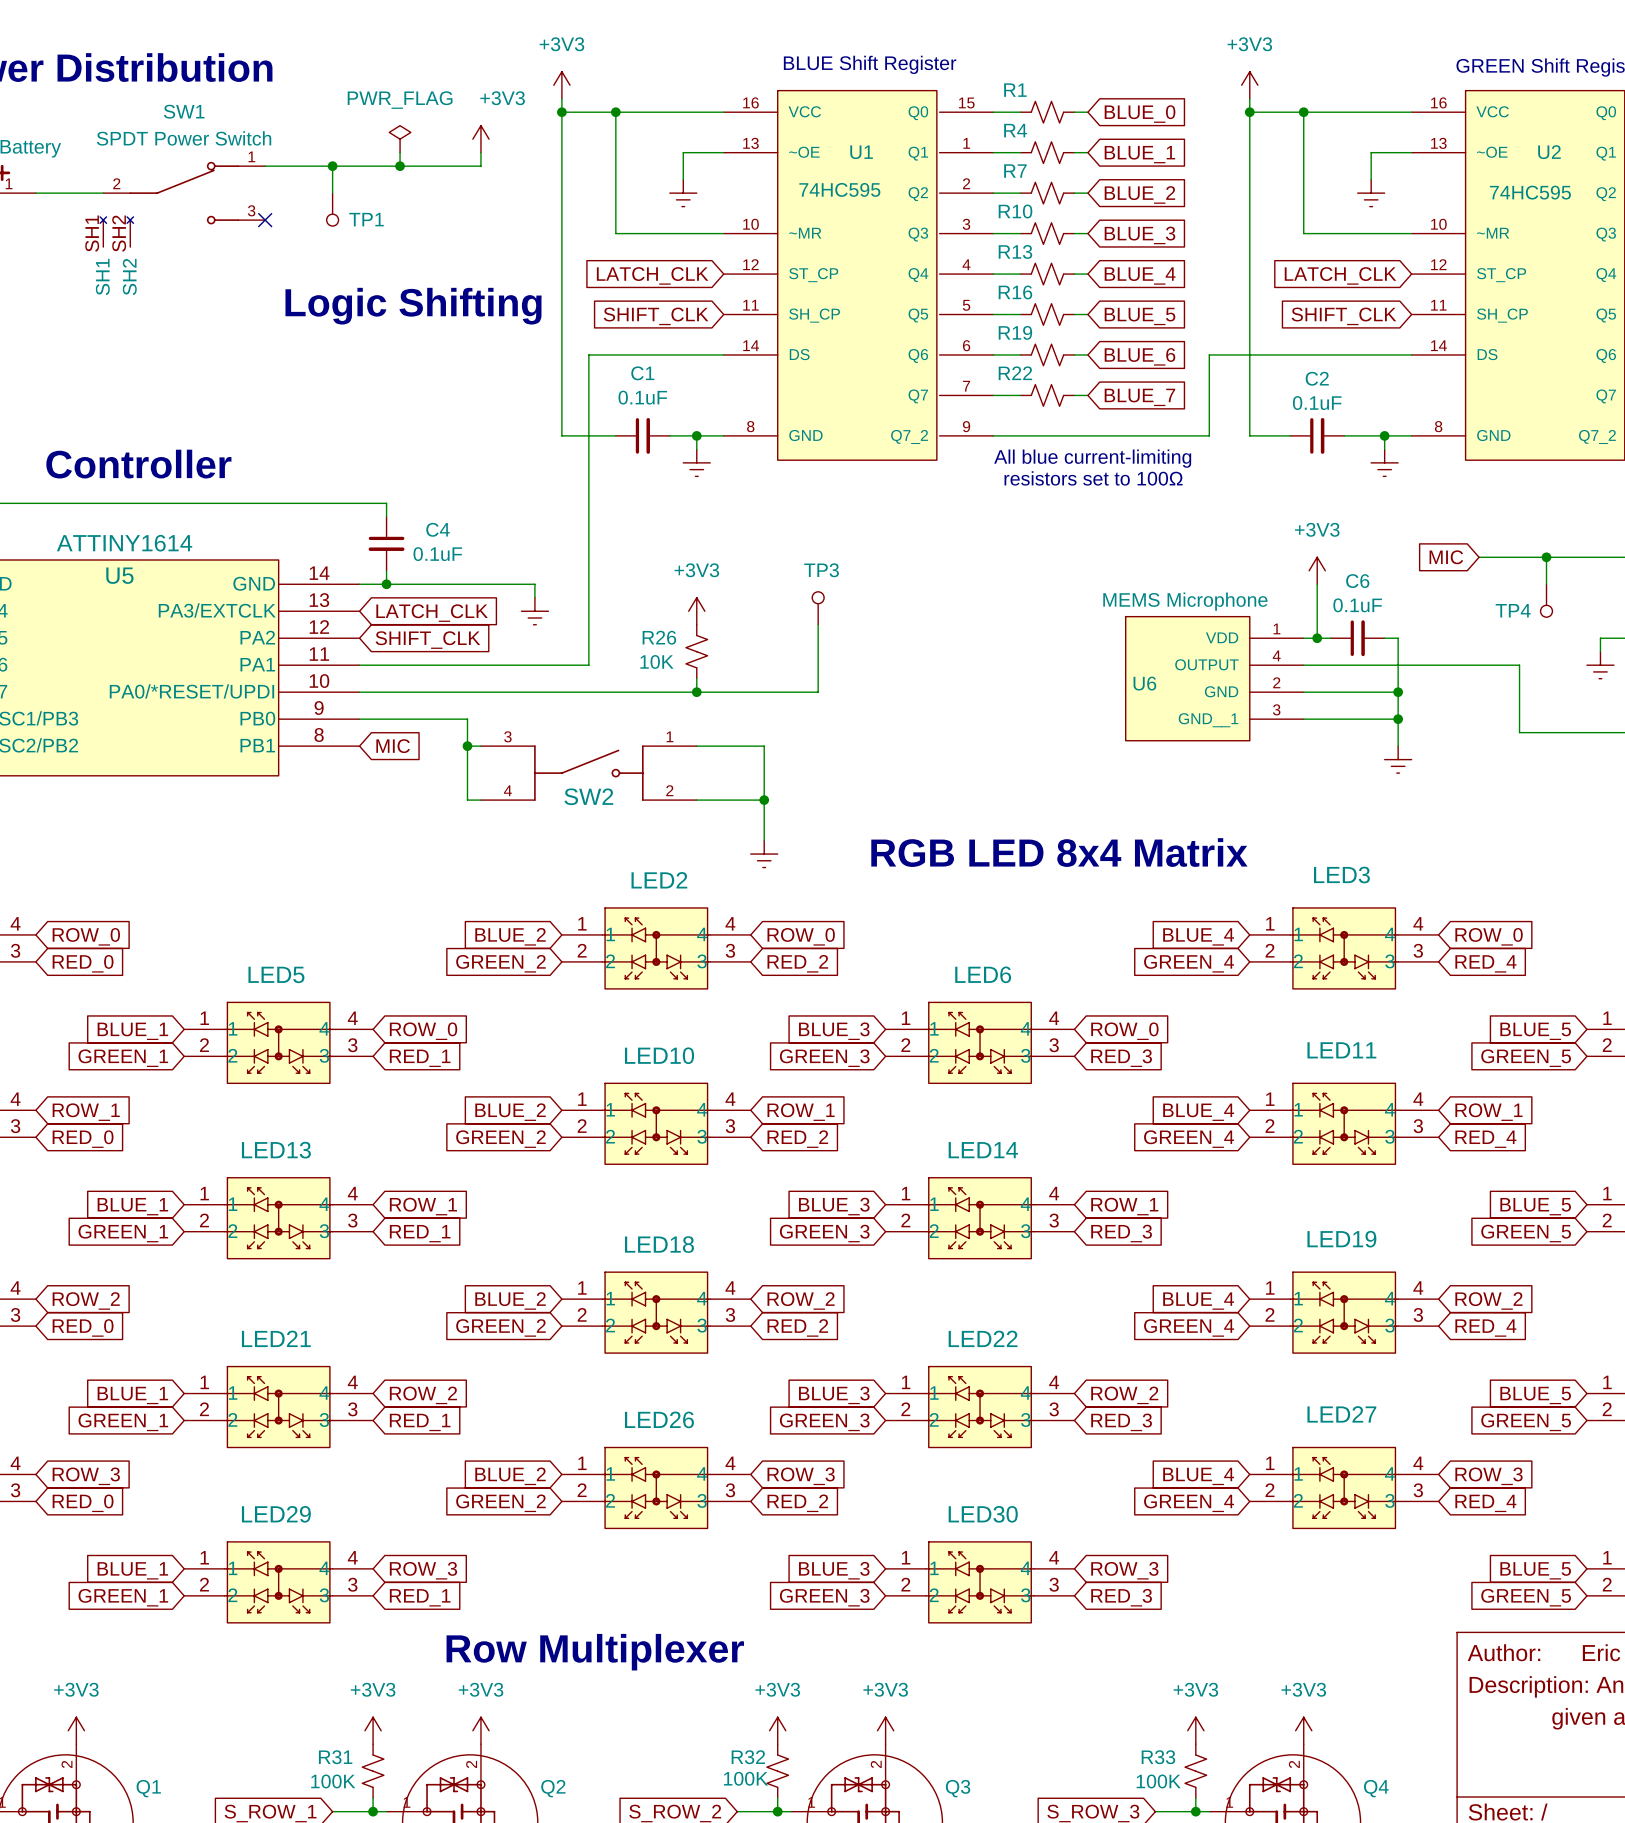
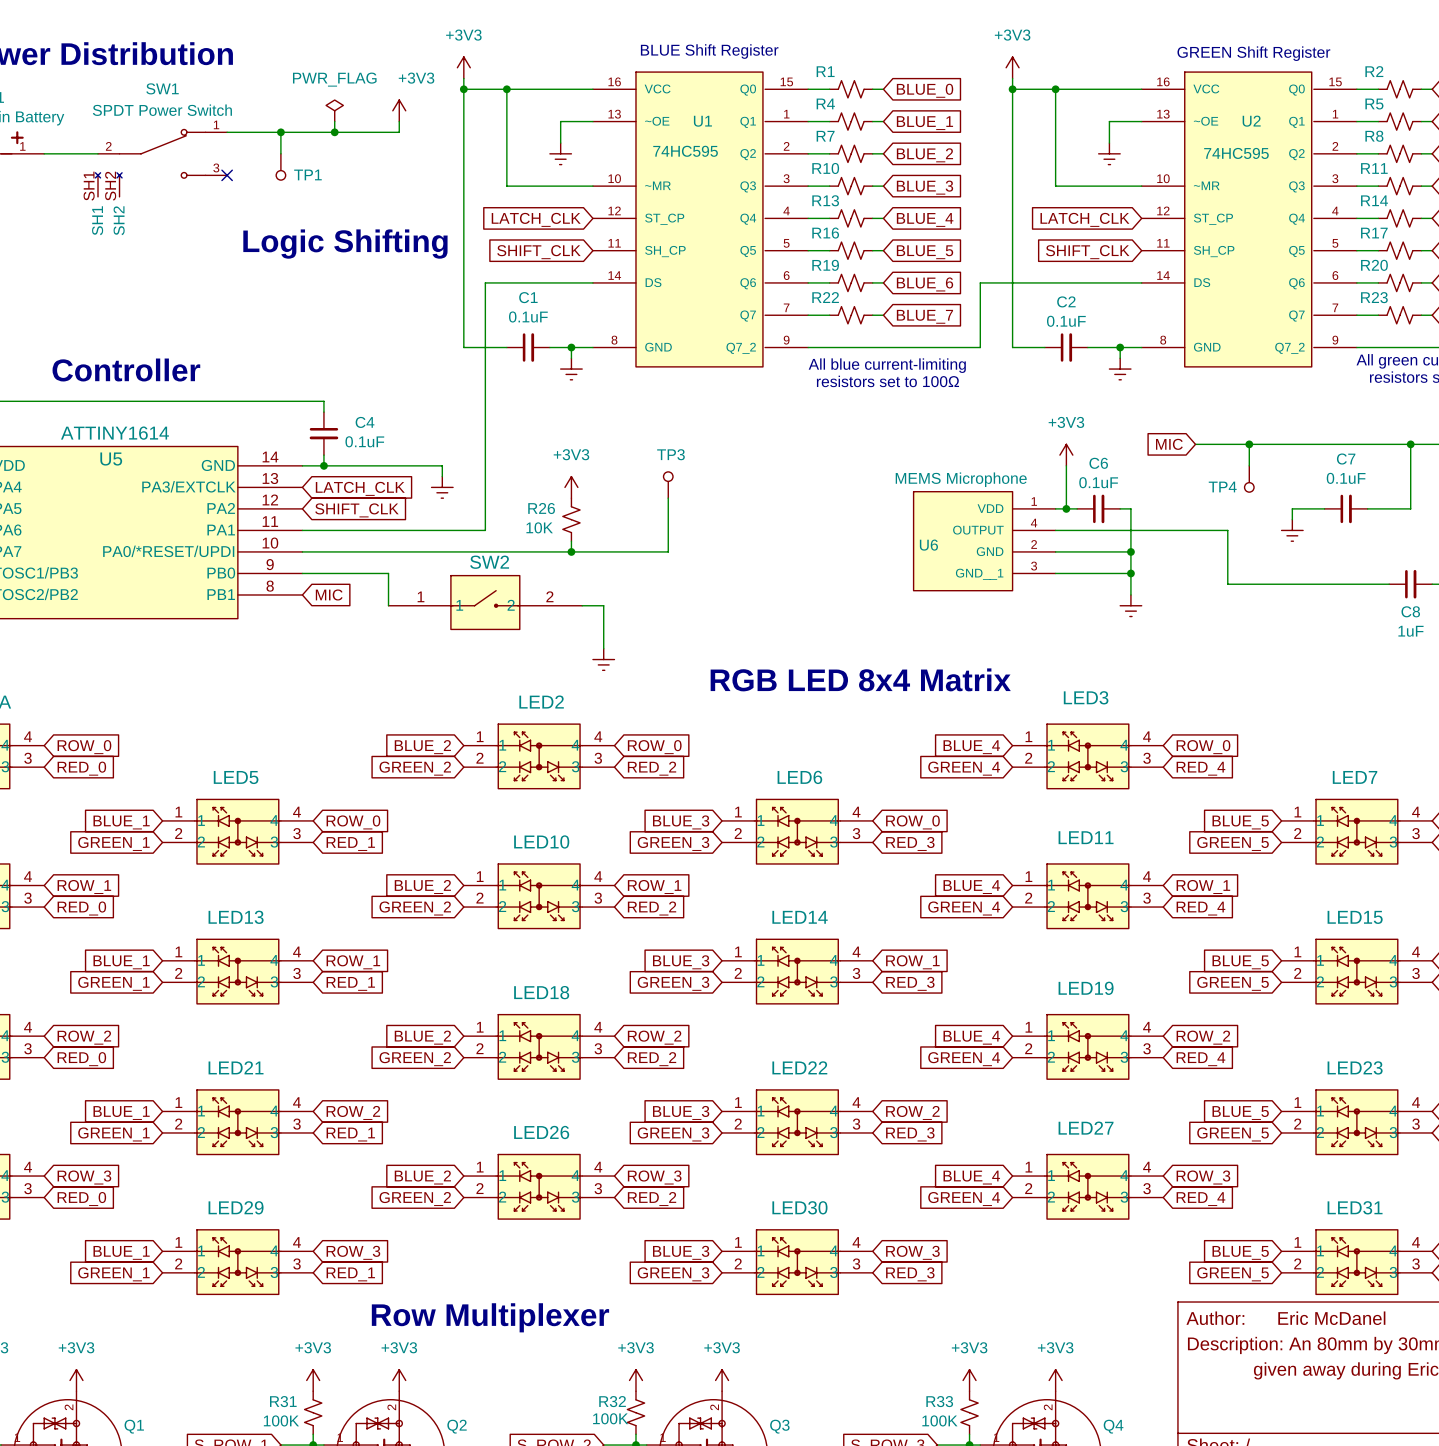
SW2 symbol: [480, 745, 697, 801] -> [388, 575, 583, 630]
wire: (467, 746) (480, 746) -> none
junction: (467, 746) -> none
wire: (696, 746) (764, 746) (764, 840) -> none
wire: (467, 759) (467, 800) (480, 800) -> none
wire: none -> (582, 605) (603, 605) (603, 648)
SW2 name position: SW2 (588, 796) -> SW2 (489, 562)
wire: (696, 800) (764, 800) -> none
junction: (764, 800) -> none
power symbol position: (764, 854) -> (603, 659)

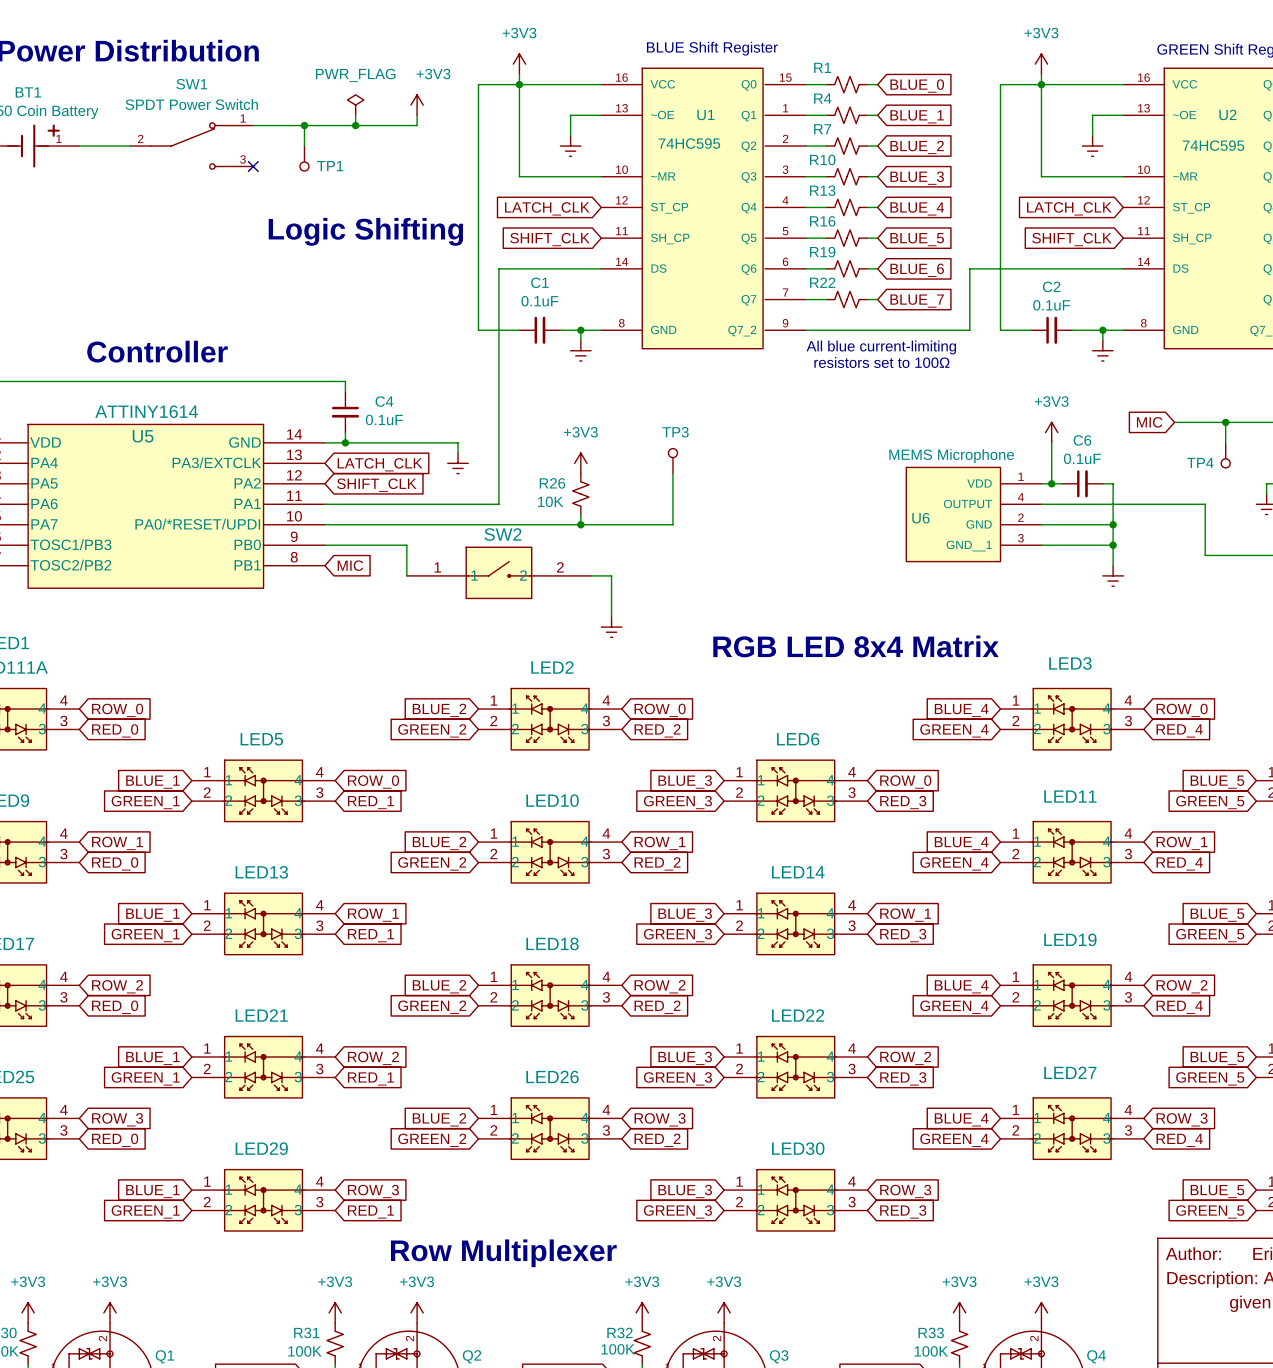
power symbol position: +3V3 (463, 67) -> +3V3 (519, 64)
power symbol position: +3V3 (1012, 67) -> +3V3 (1041, 64)
wire: (463, 78) (463, 89) -> (519, 74) (519, 84)
wire: (1012, 78) (1012, 89) -> (1041, 74) (1041, 84)
junction: (463, 89) -> none
junction: (1012, 89) -> none
SW1 symbol: [95, 128, 228, 197] -> [130, 122, 254, 170]

